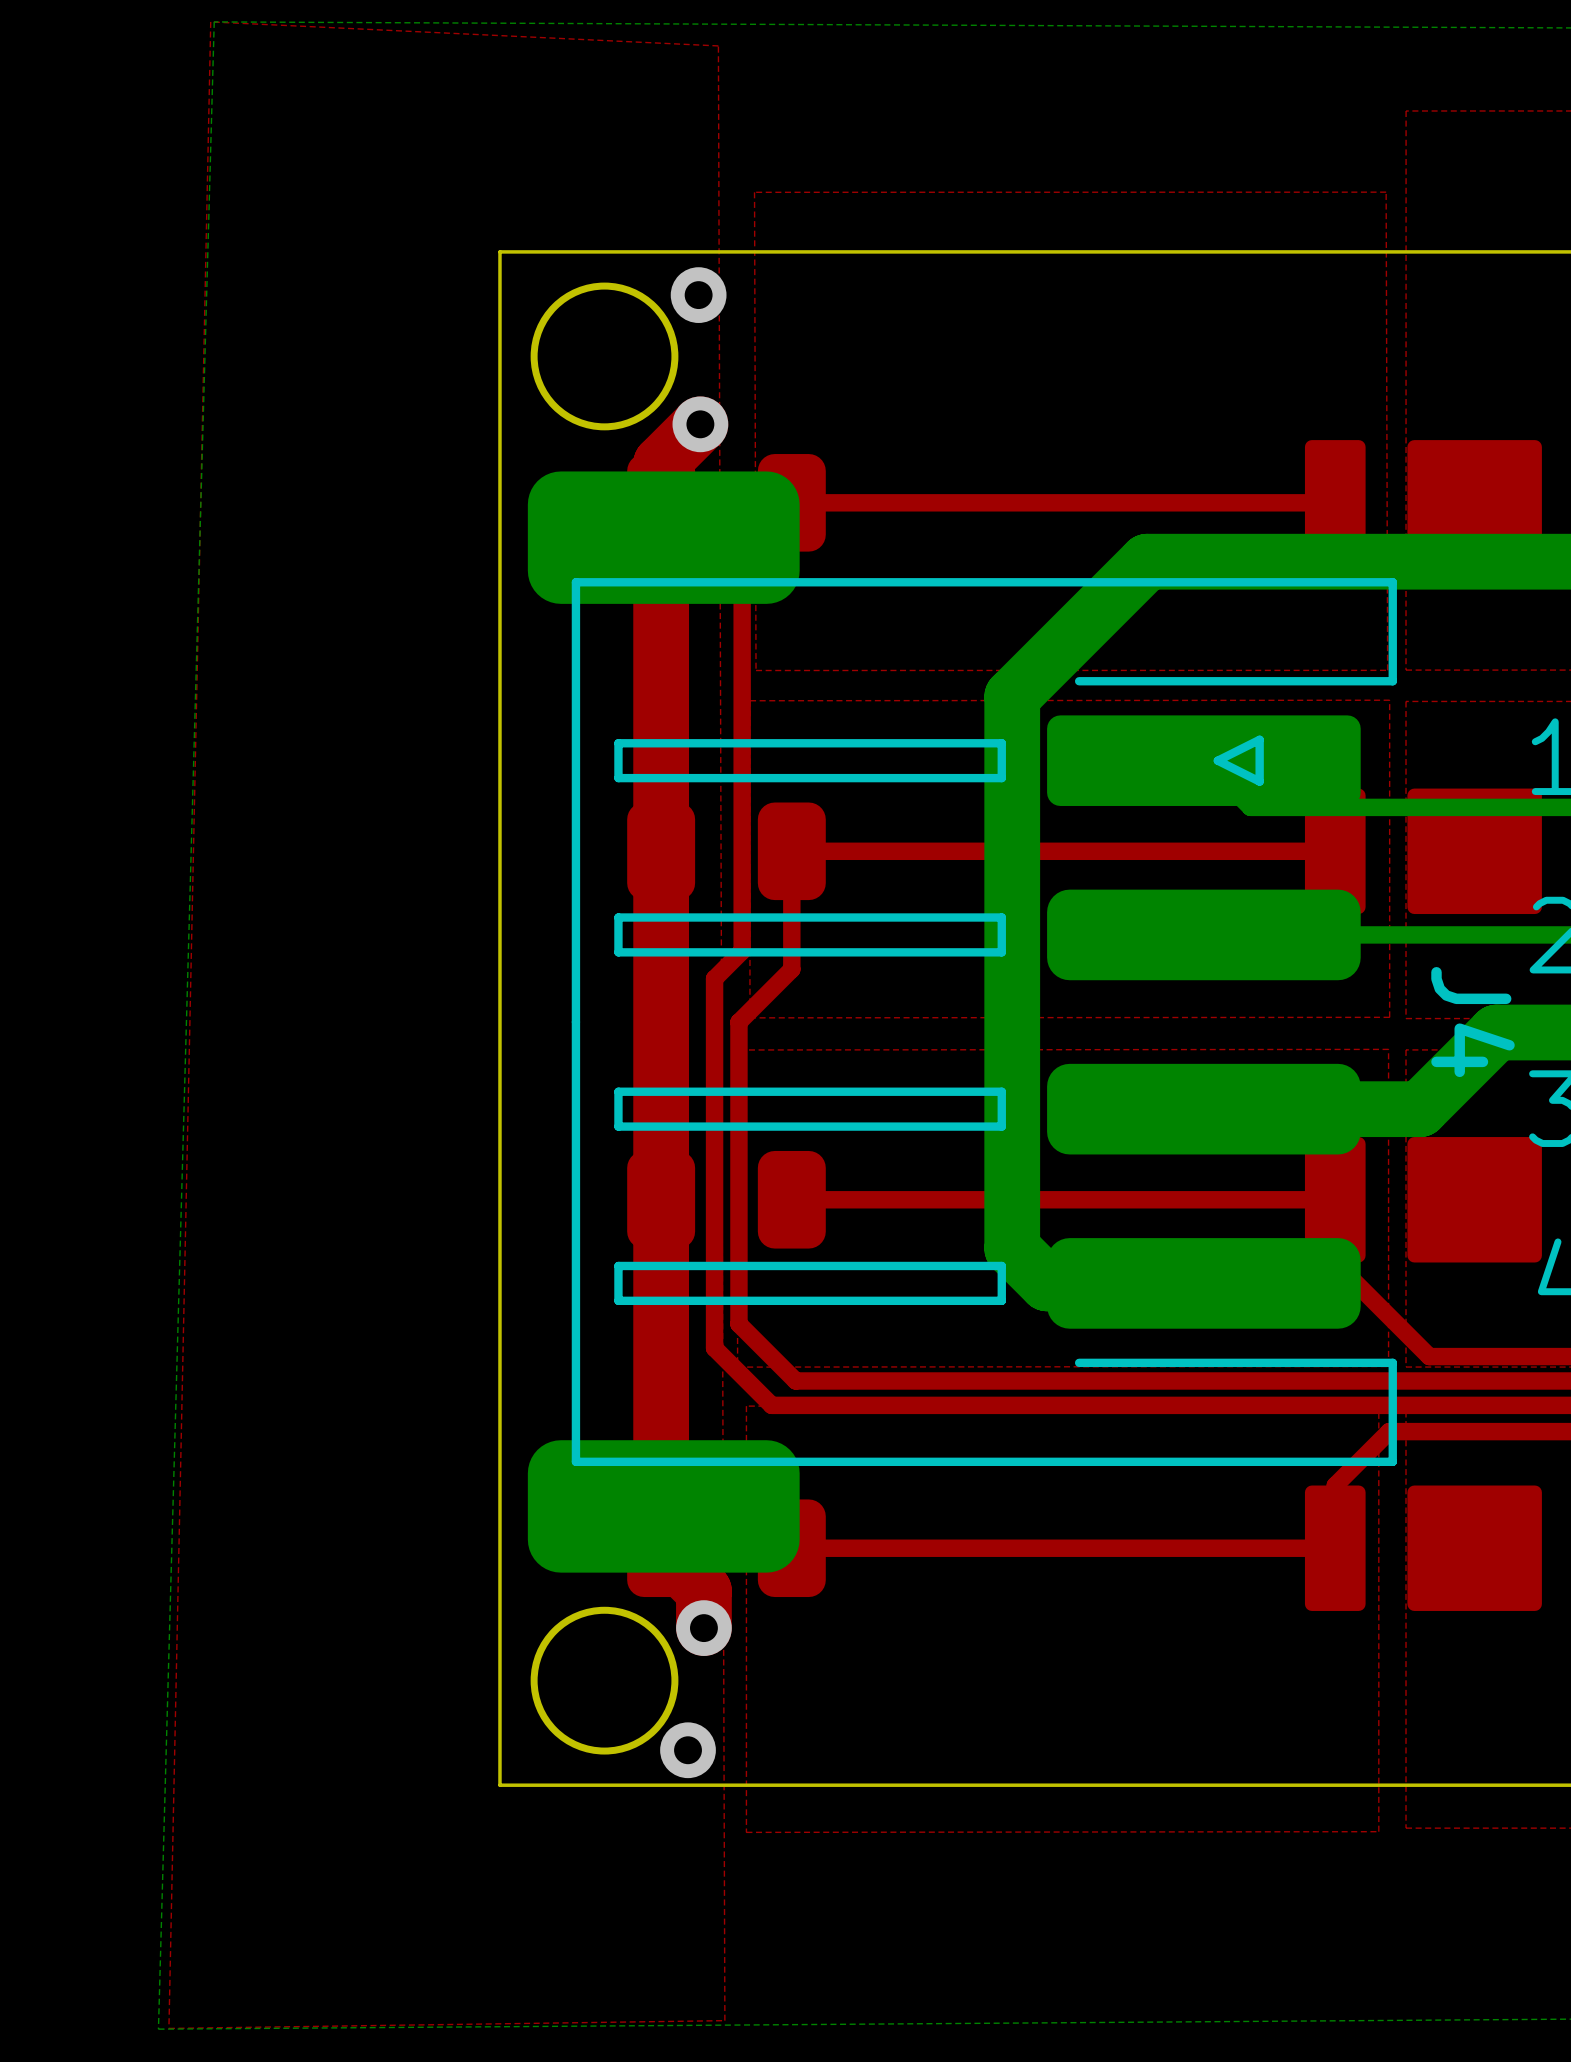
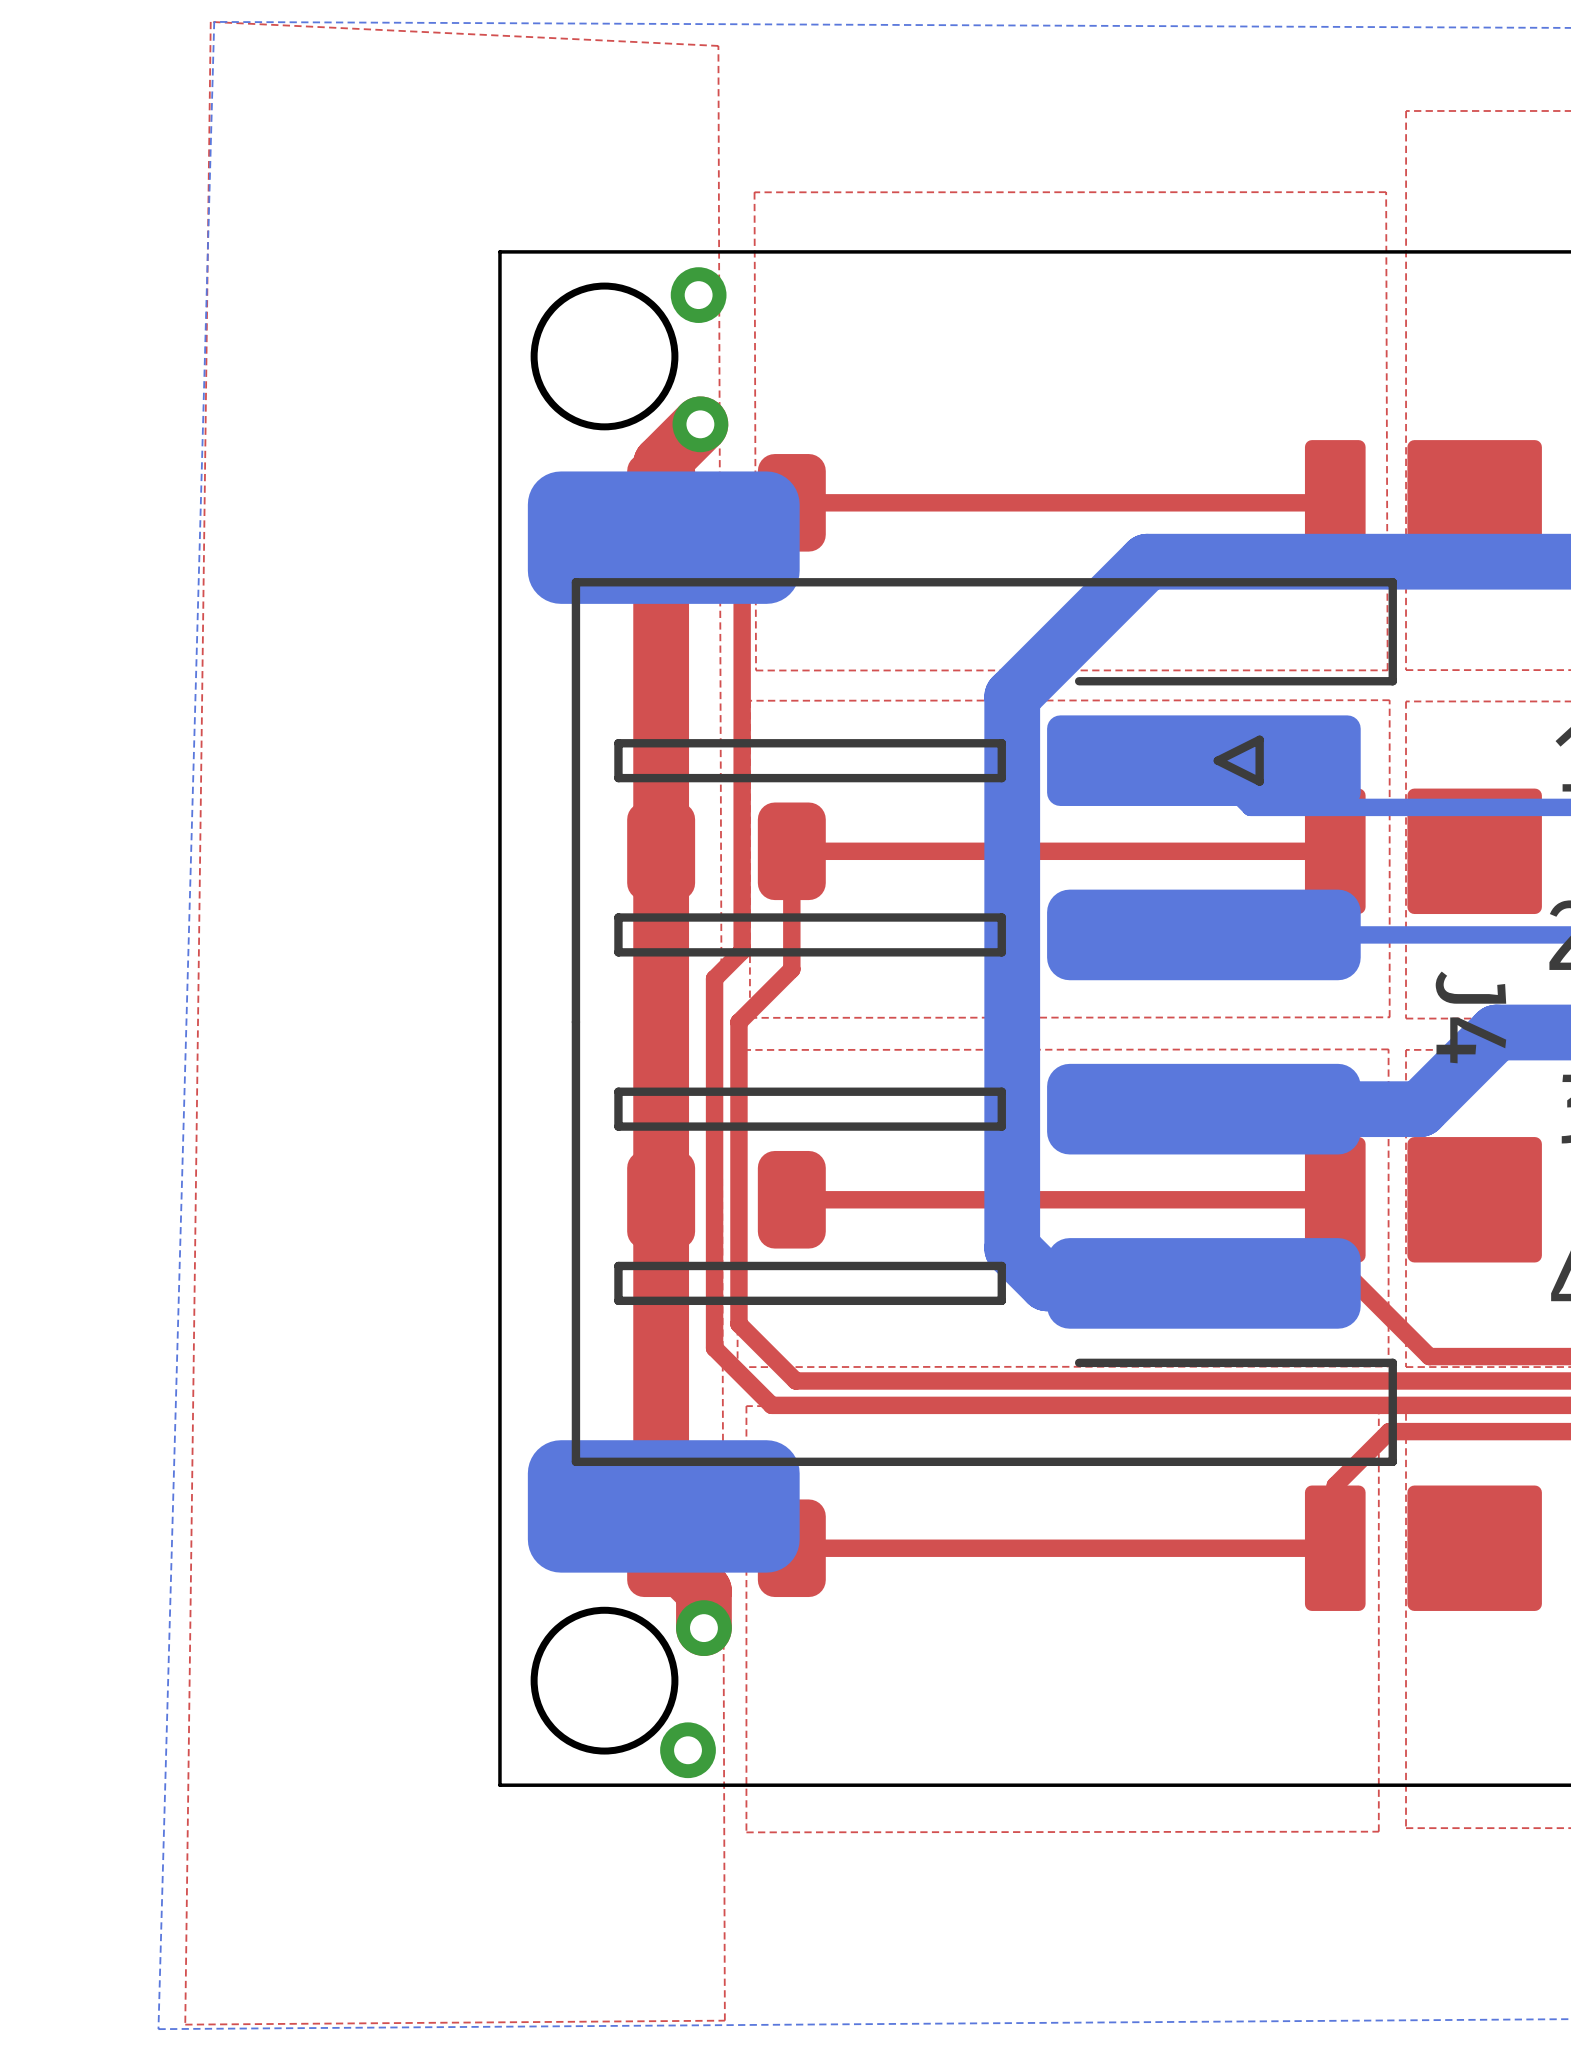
top zone outline: (210, 21) (168, 2028) (724, 2020) -> (210, 21) (185, 2024) (724, 2020)

